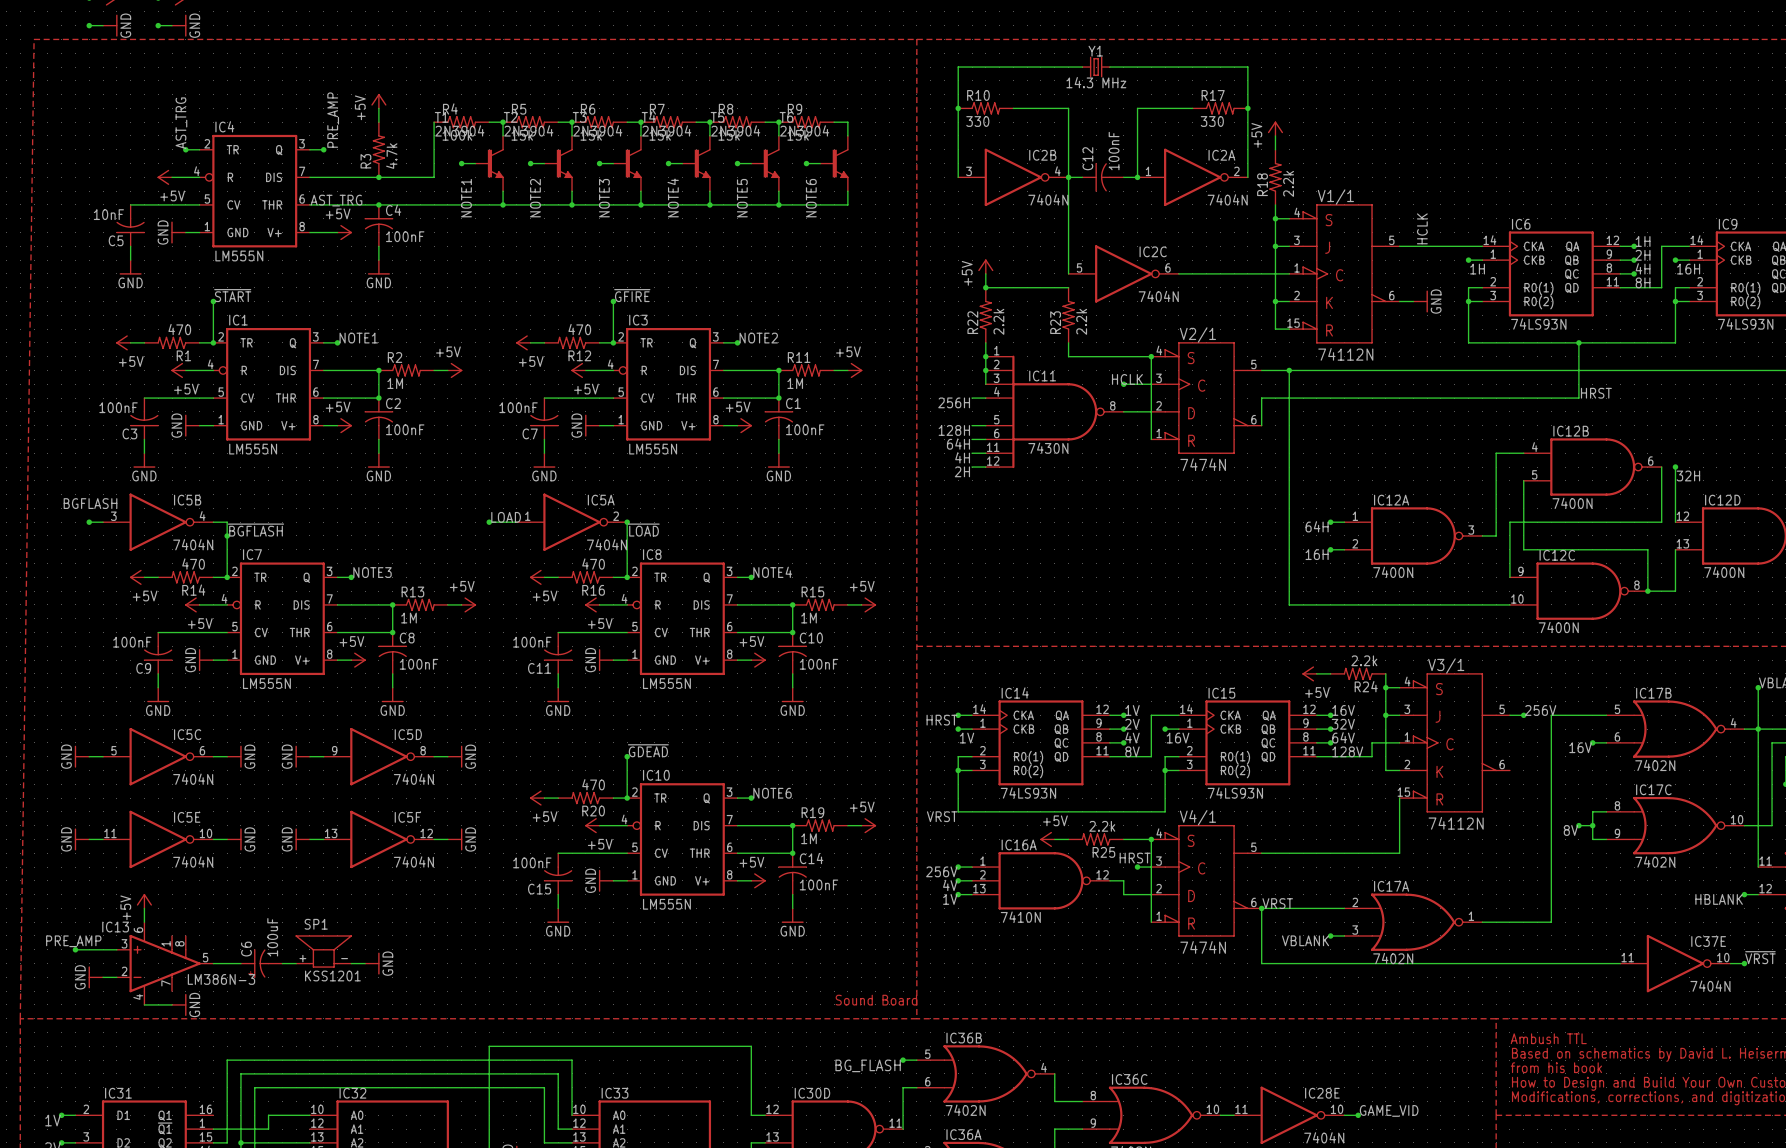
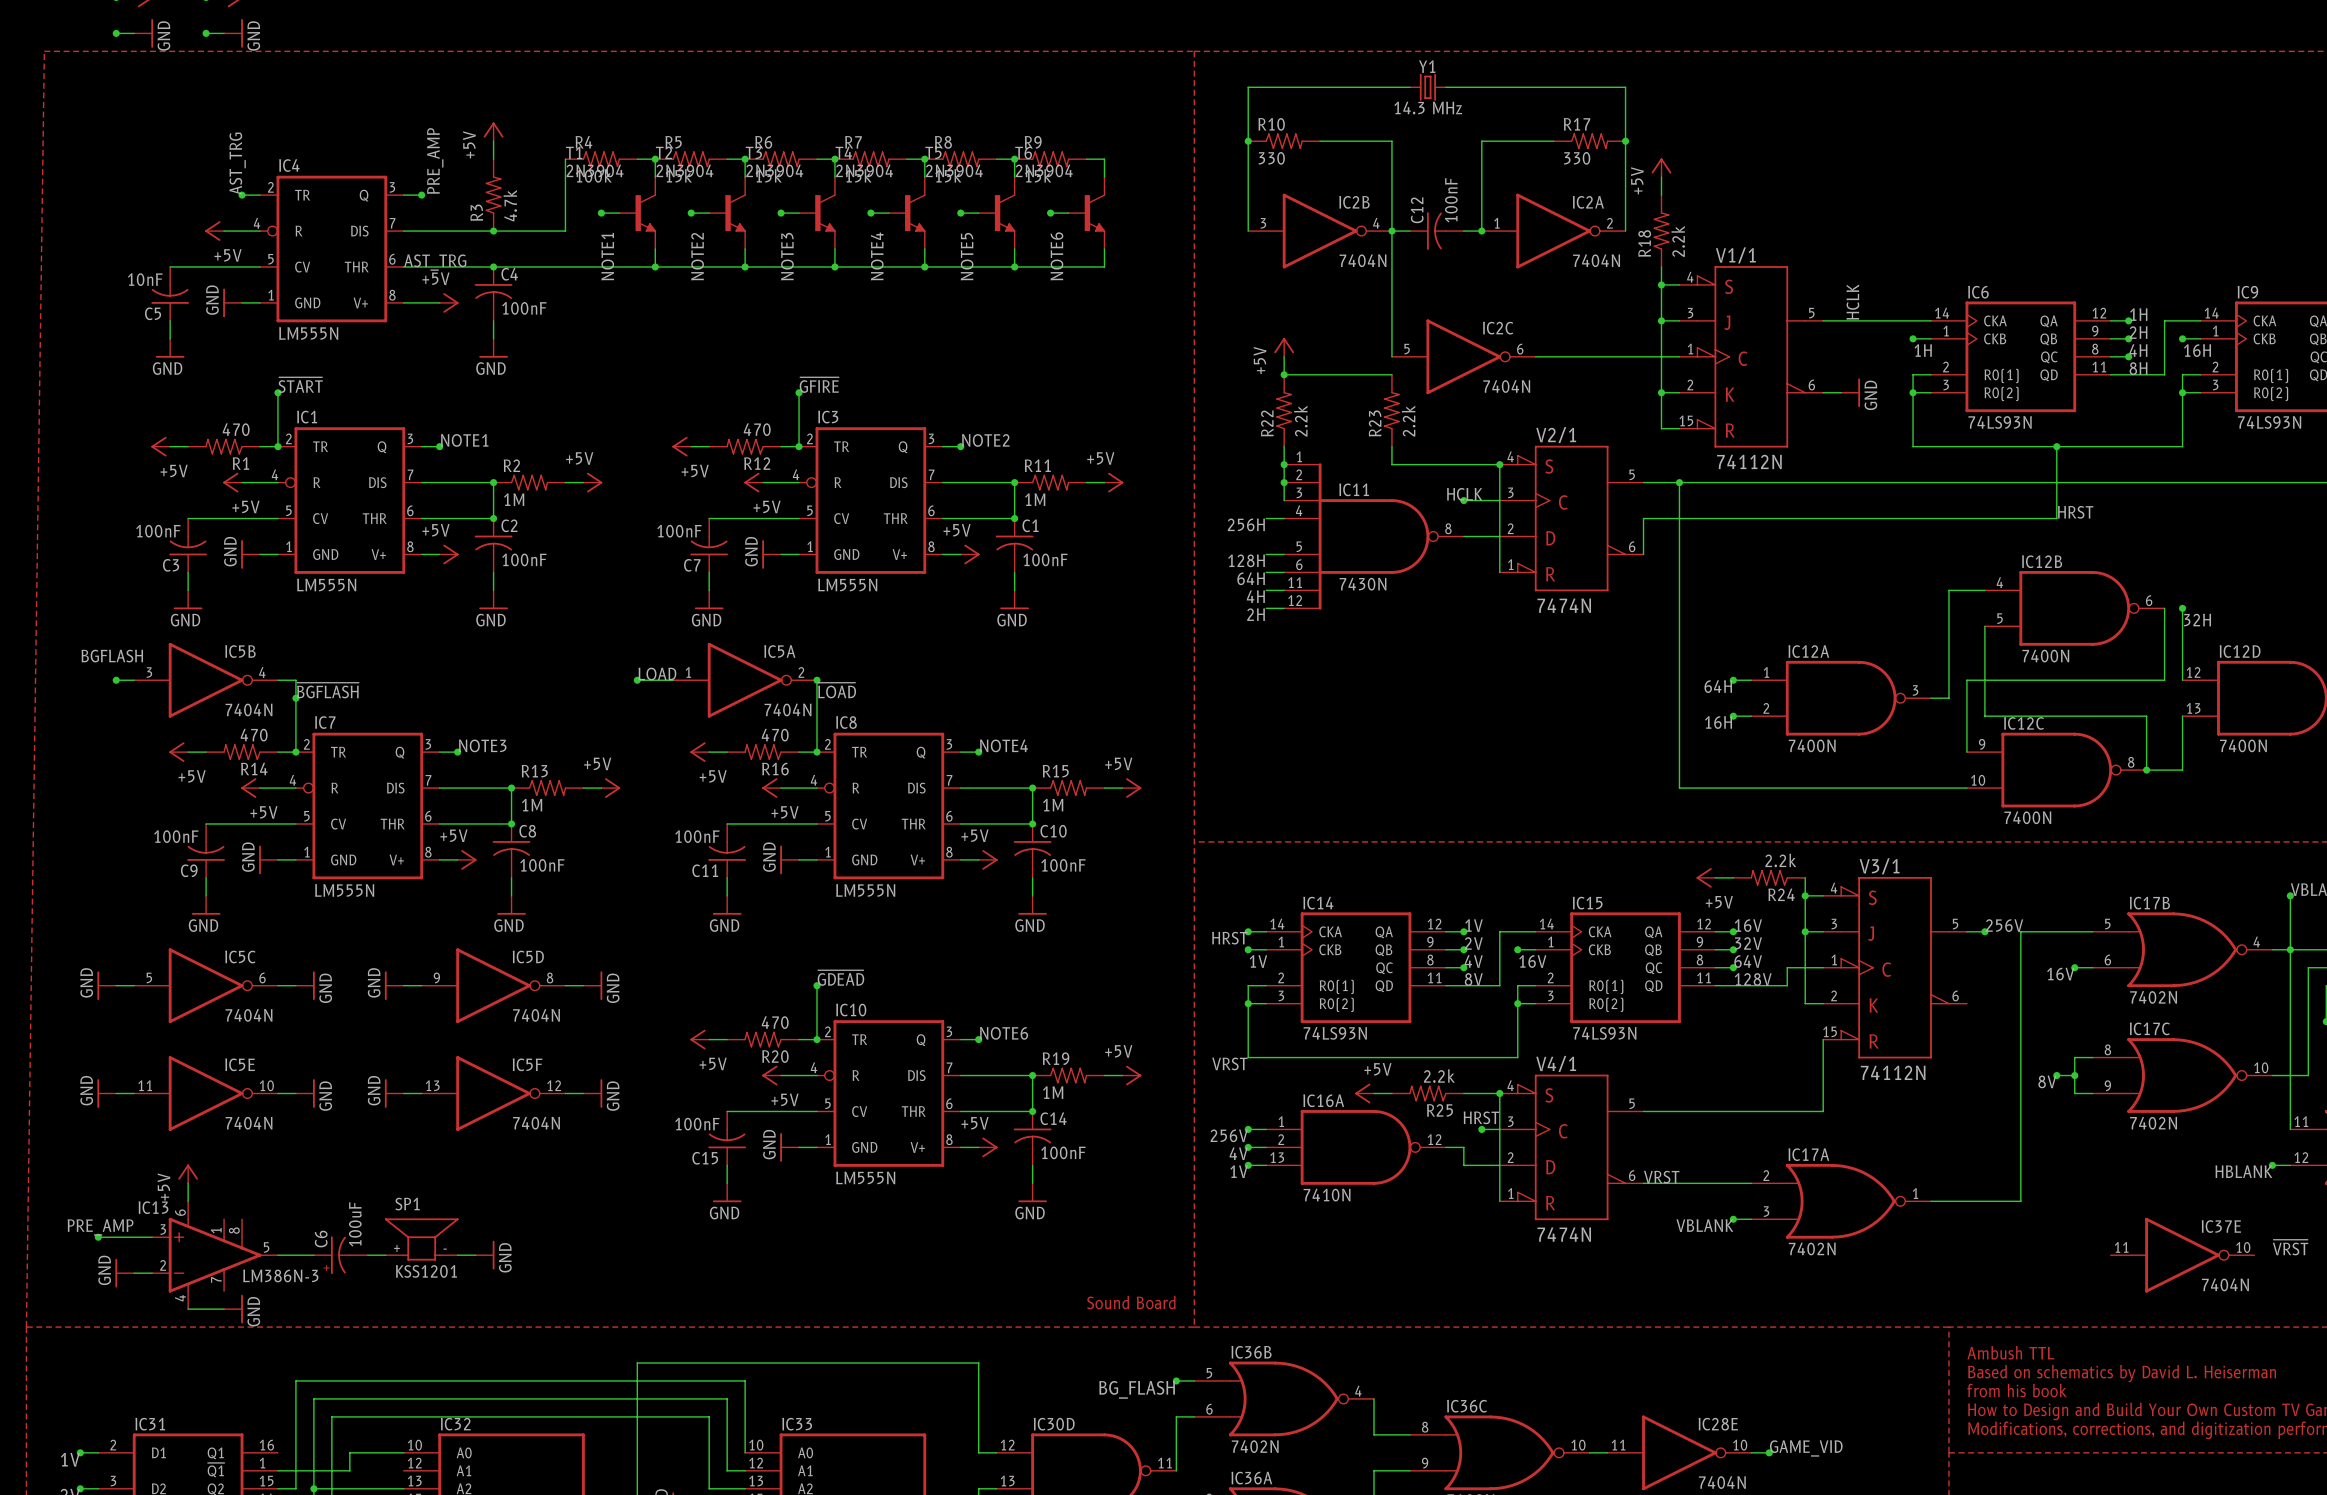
wire: (1261, 908) (1261, 963) (1620, 963) -> none
junction: (1261, 908) -> none
wire: (1730, 963) (1744, 963) -> none
junction: (1744, 963) -> none

